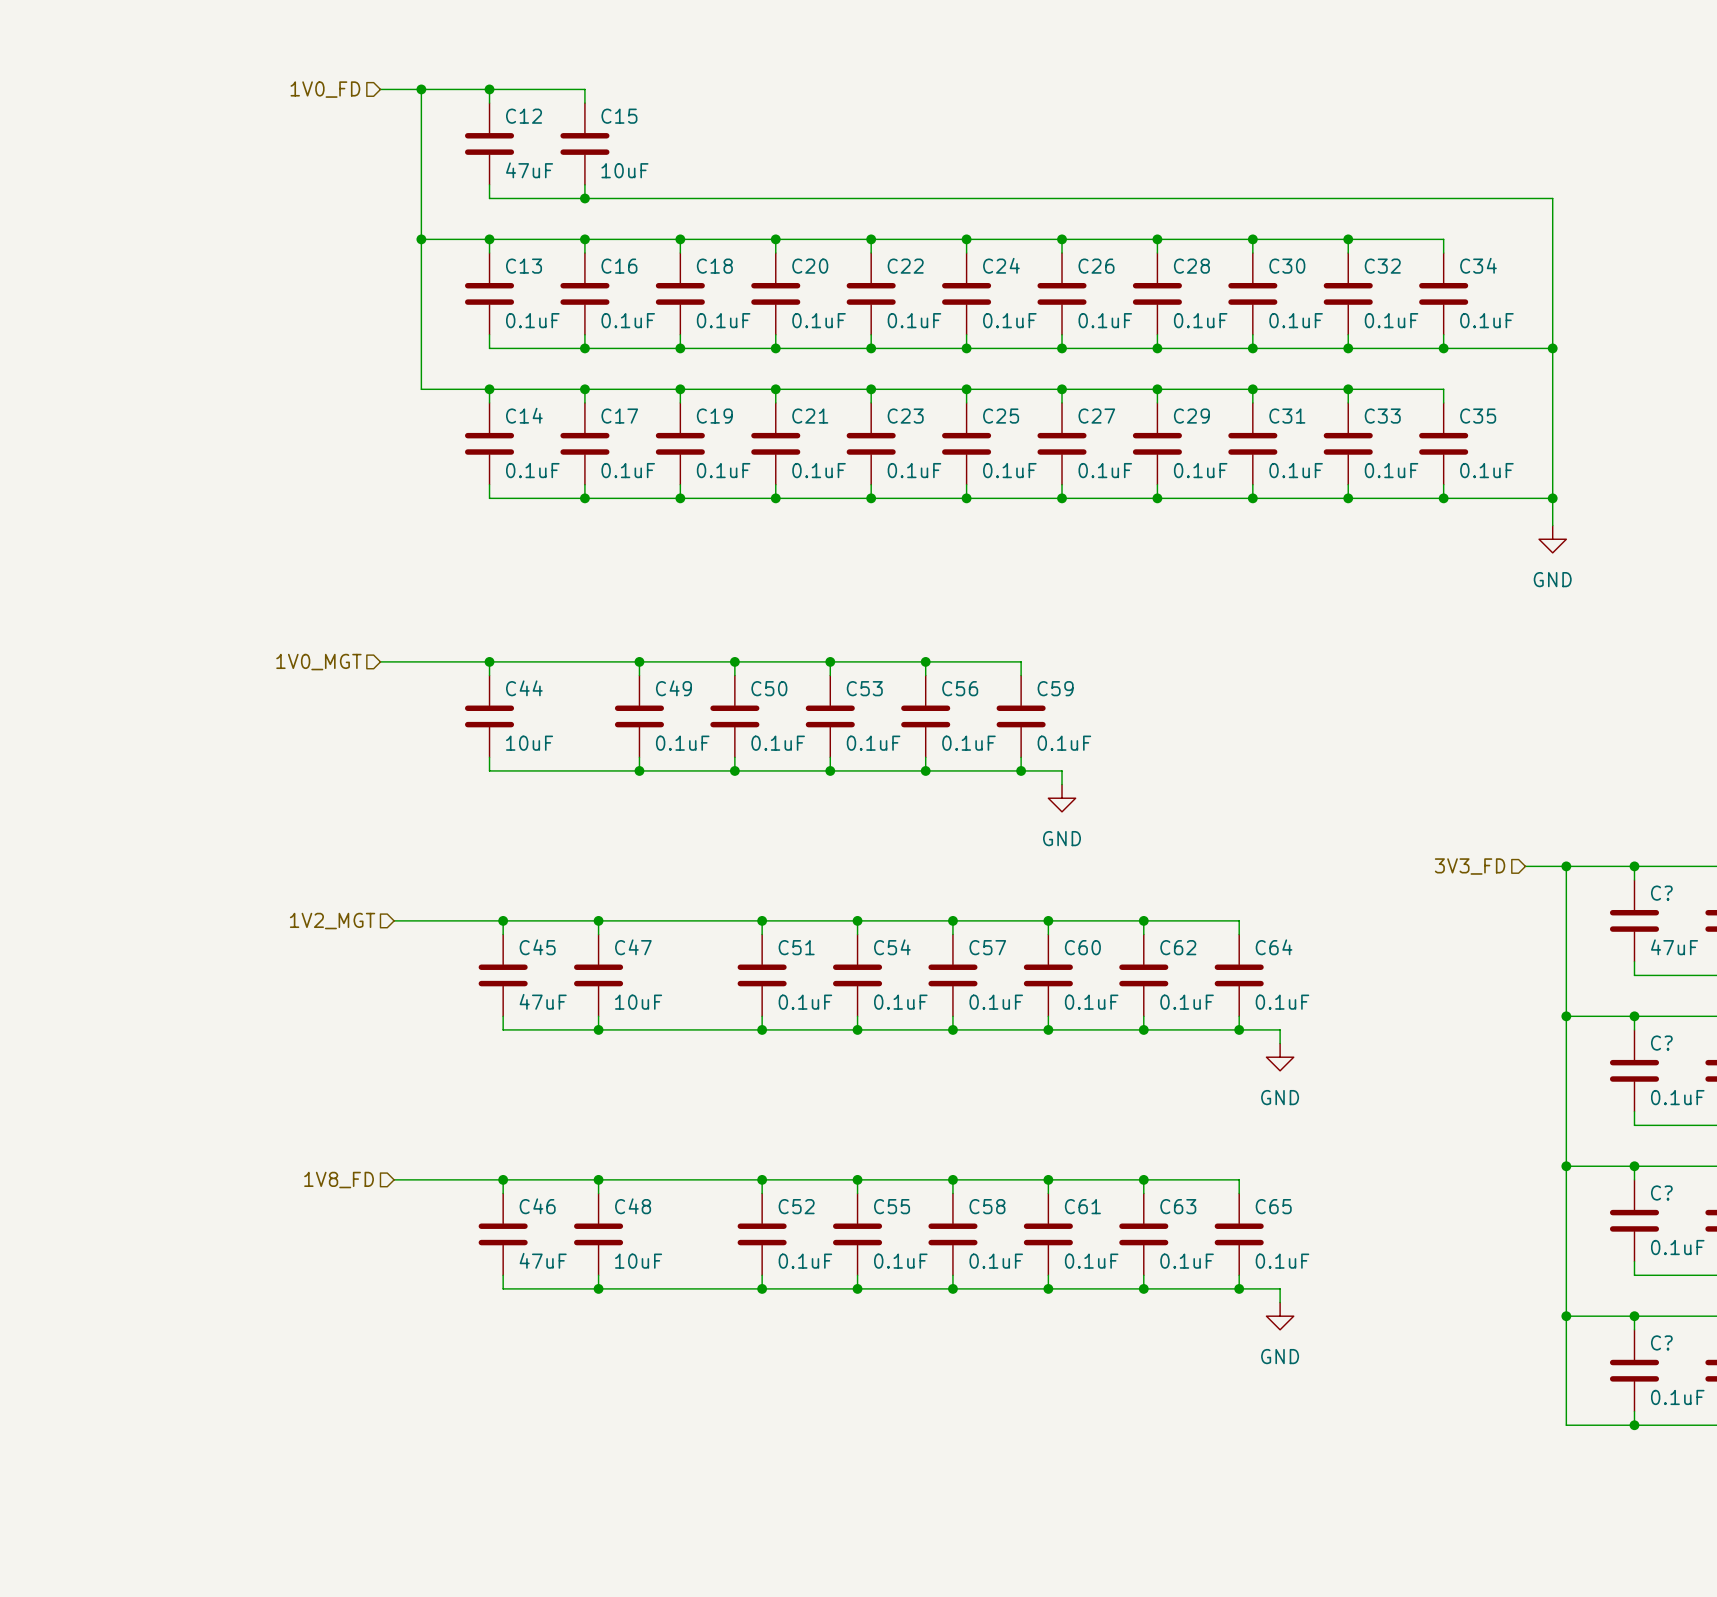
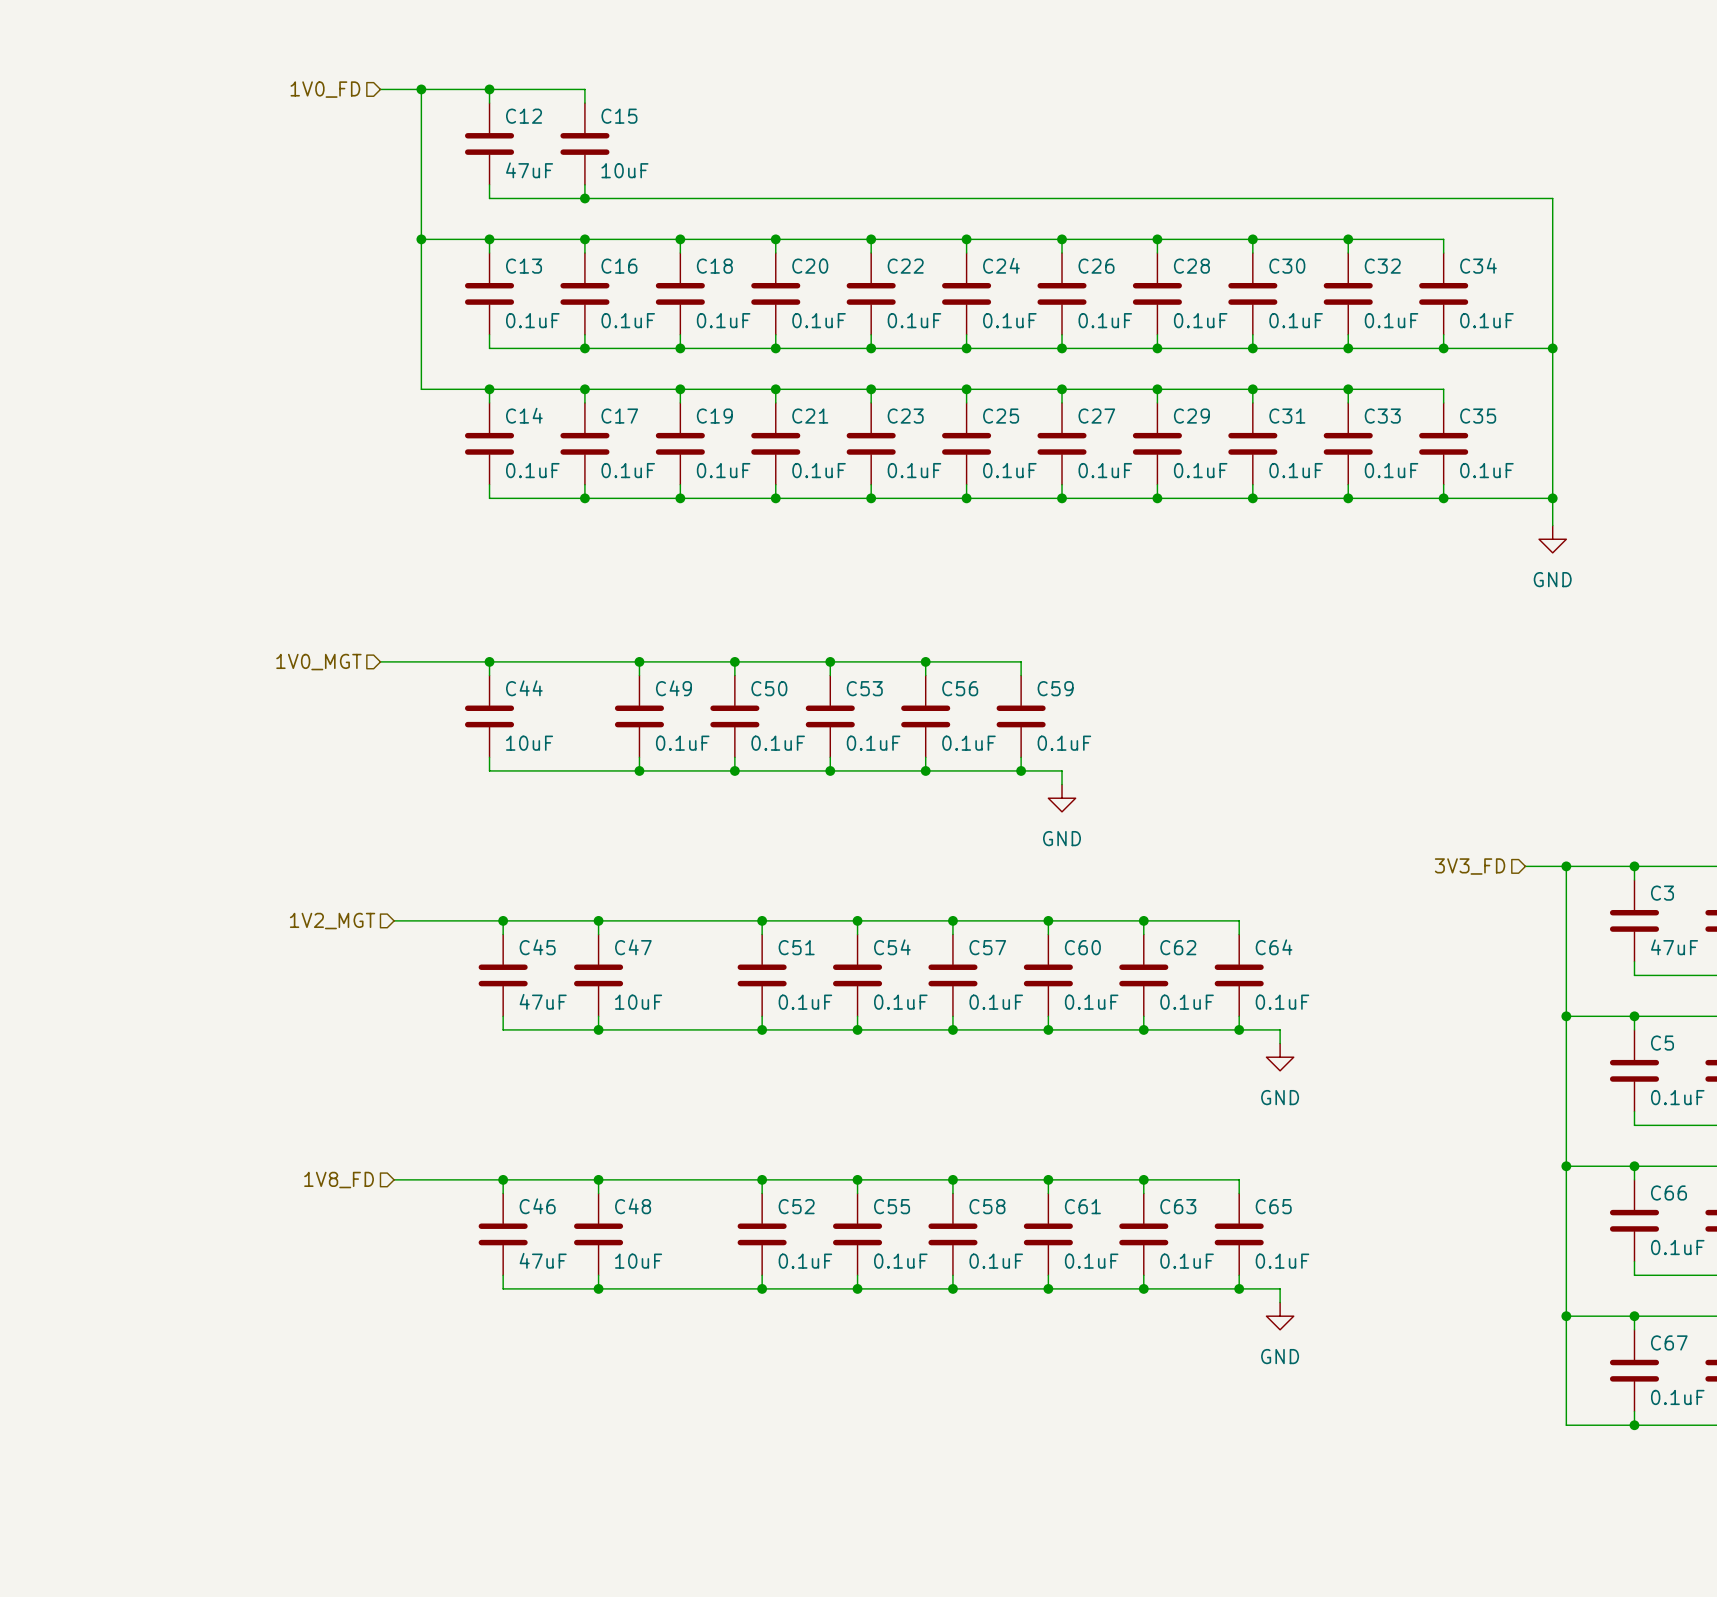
C? name: C? (1661, 893) -> C3 (1662, 893)
C? name: C? (1661, 1043) -> C5 (1662, 1043)
C? name: C? (1661, 1193) -> C66 (1668, 1193)
C? name: C? (1661, 1342) -> C67 (1669, 1342)

